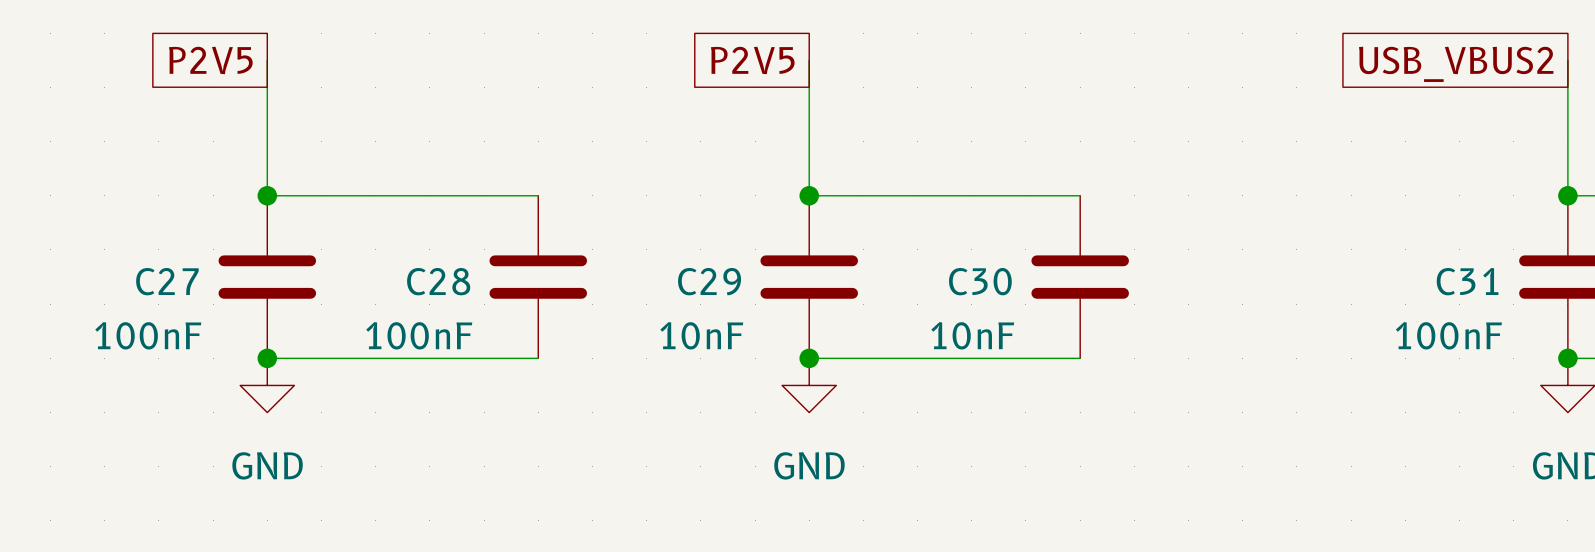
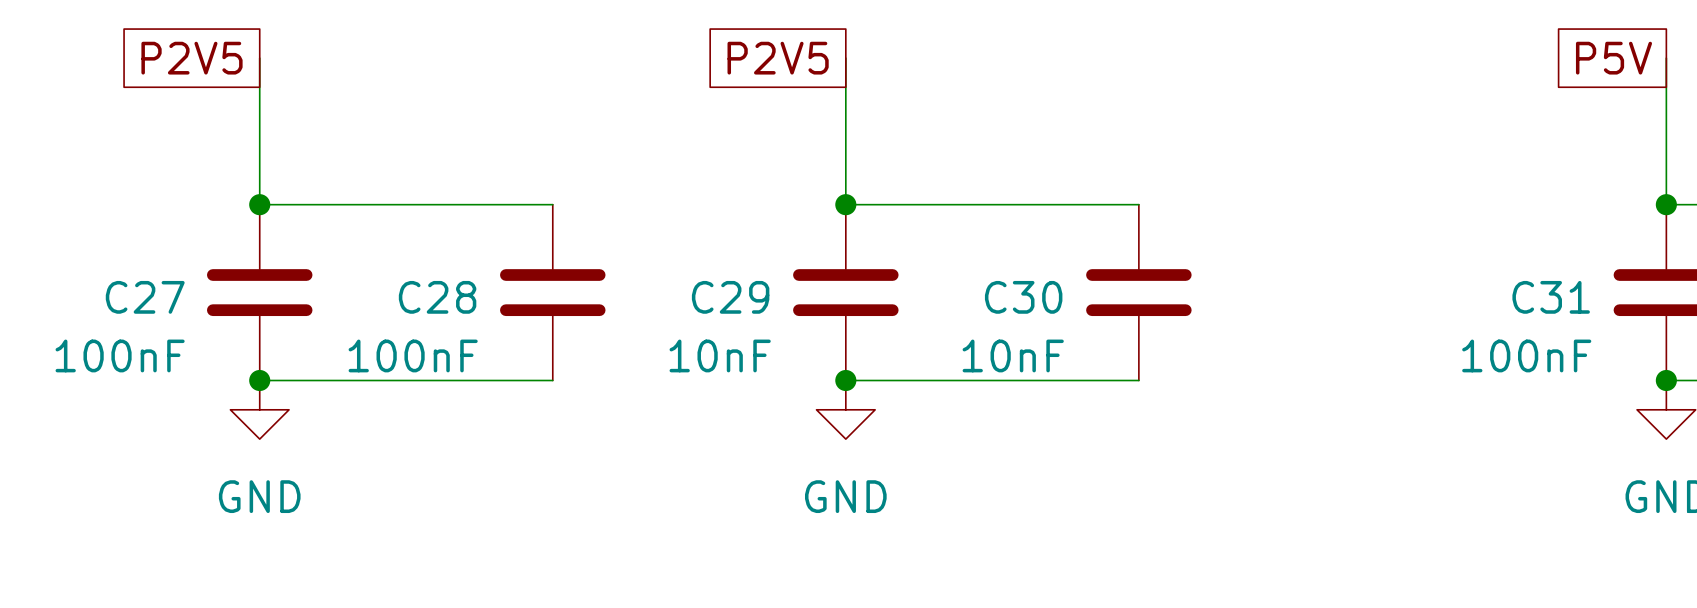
global label: USB_VBUS2 (1456, 64) -> P5V (1613, 58)

